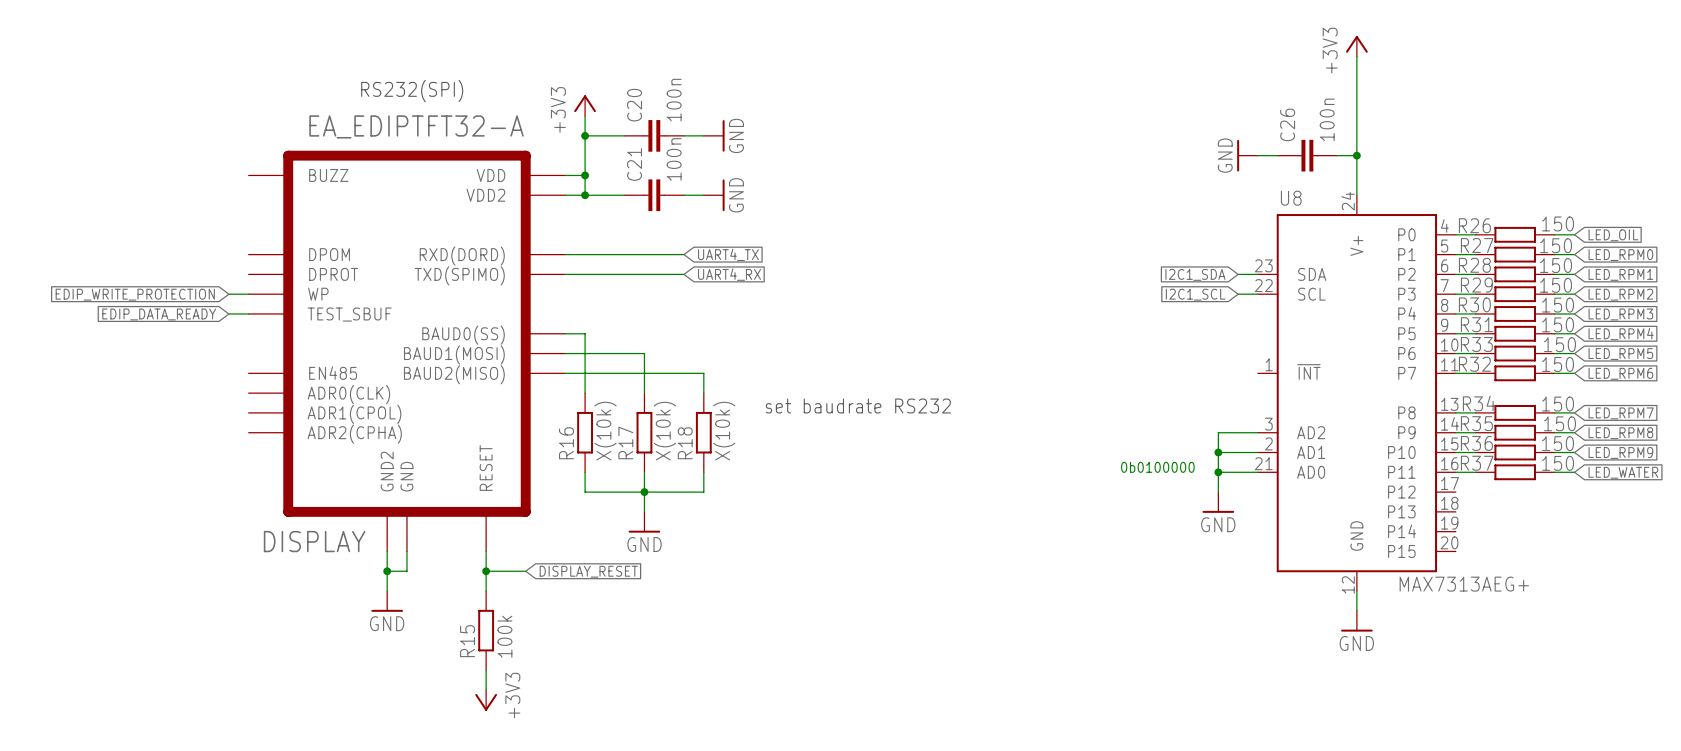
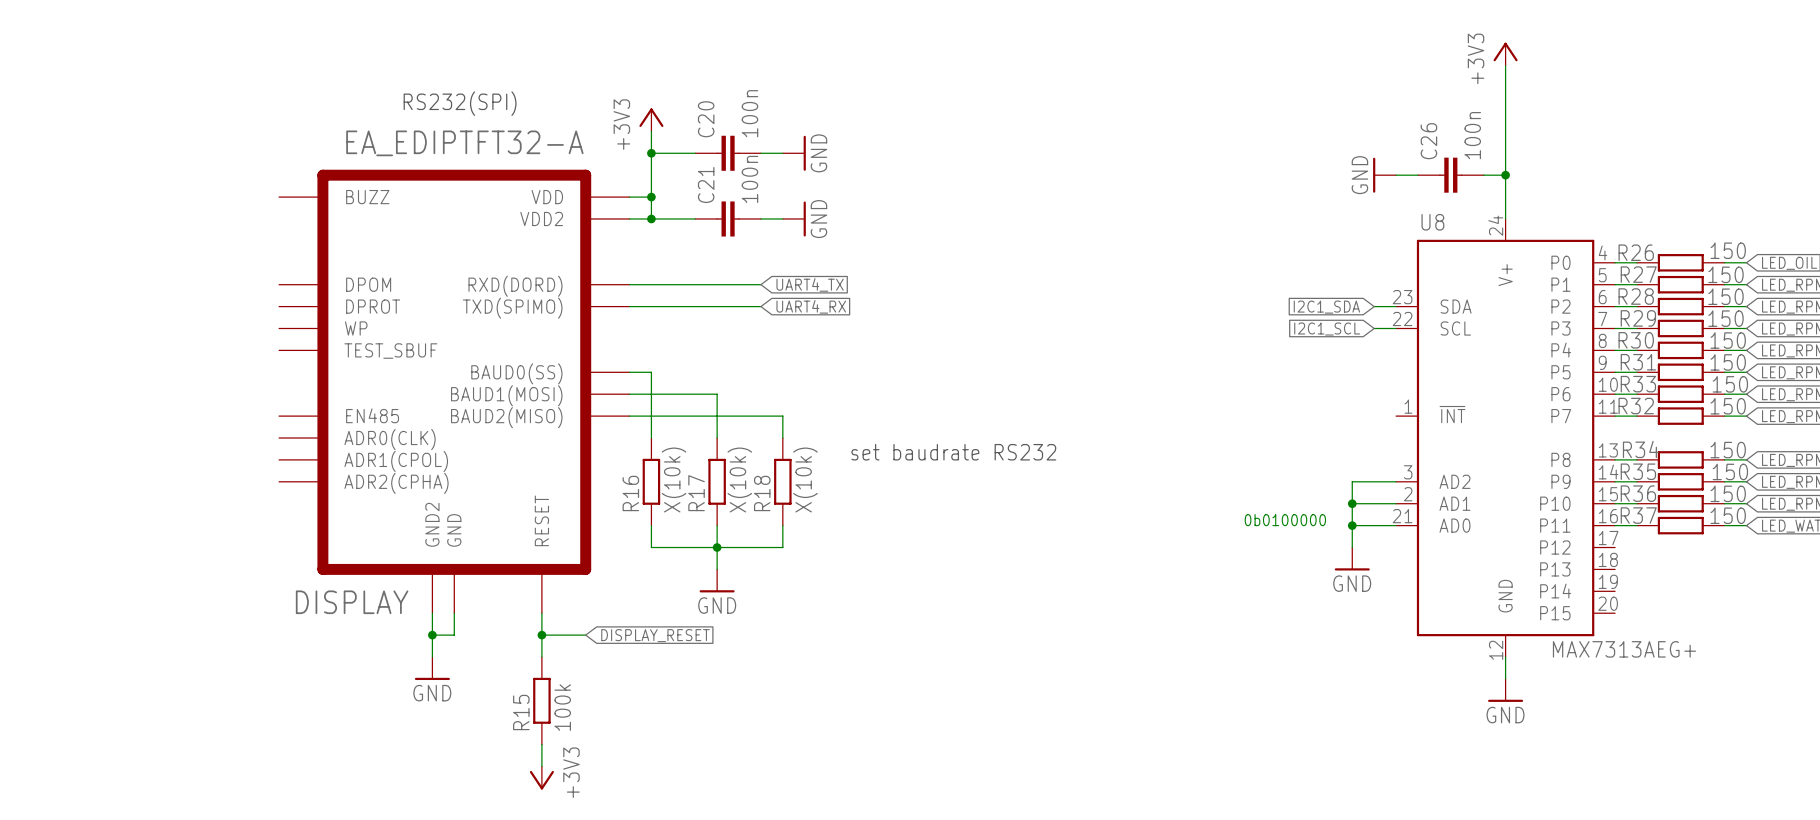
global label: EDIP_WRITE_PROTECTION (135, 294) -> none
wire: (228, 294) (248, 294) -> none
wire: (228, 313) (248, 313) -> none
global label: EDIP_DATA_READY (159, 314) -> none

